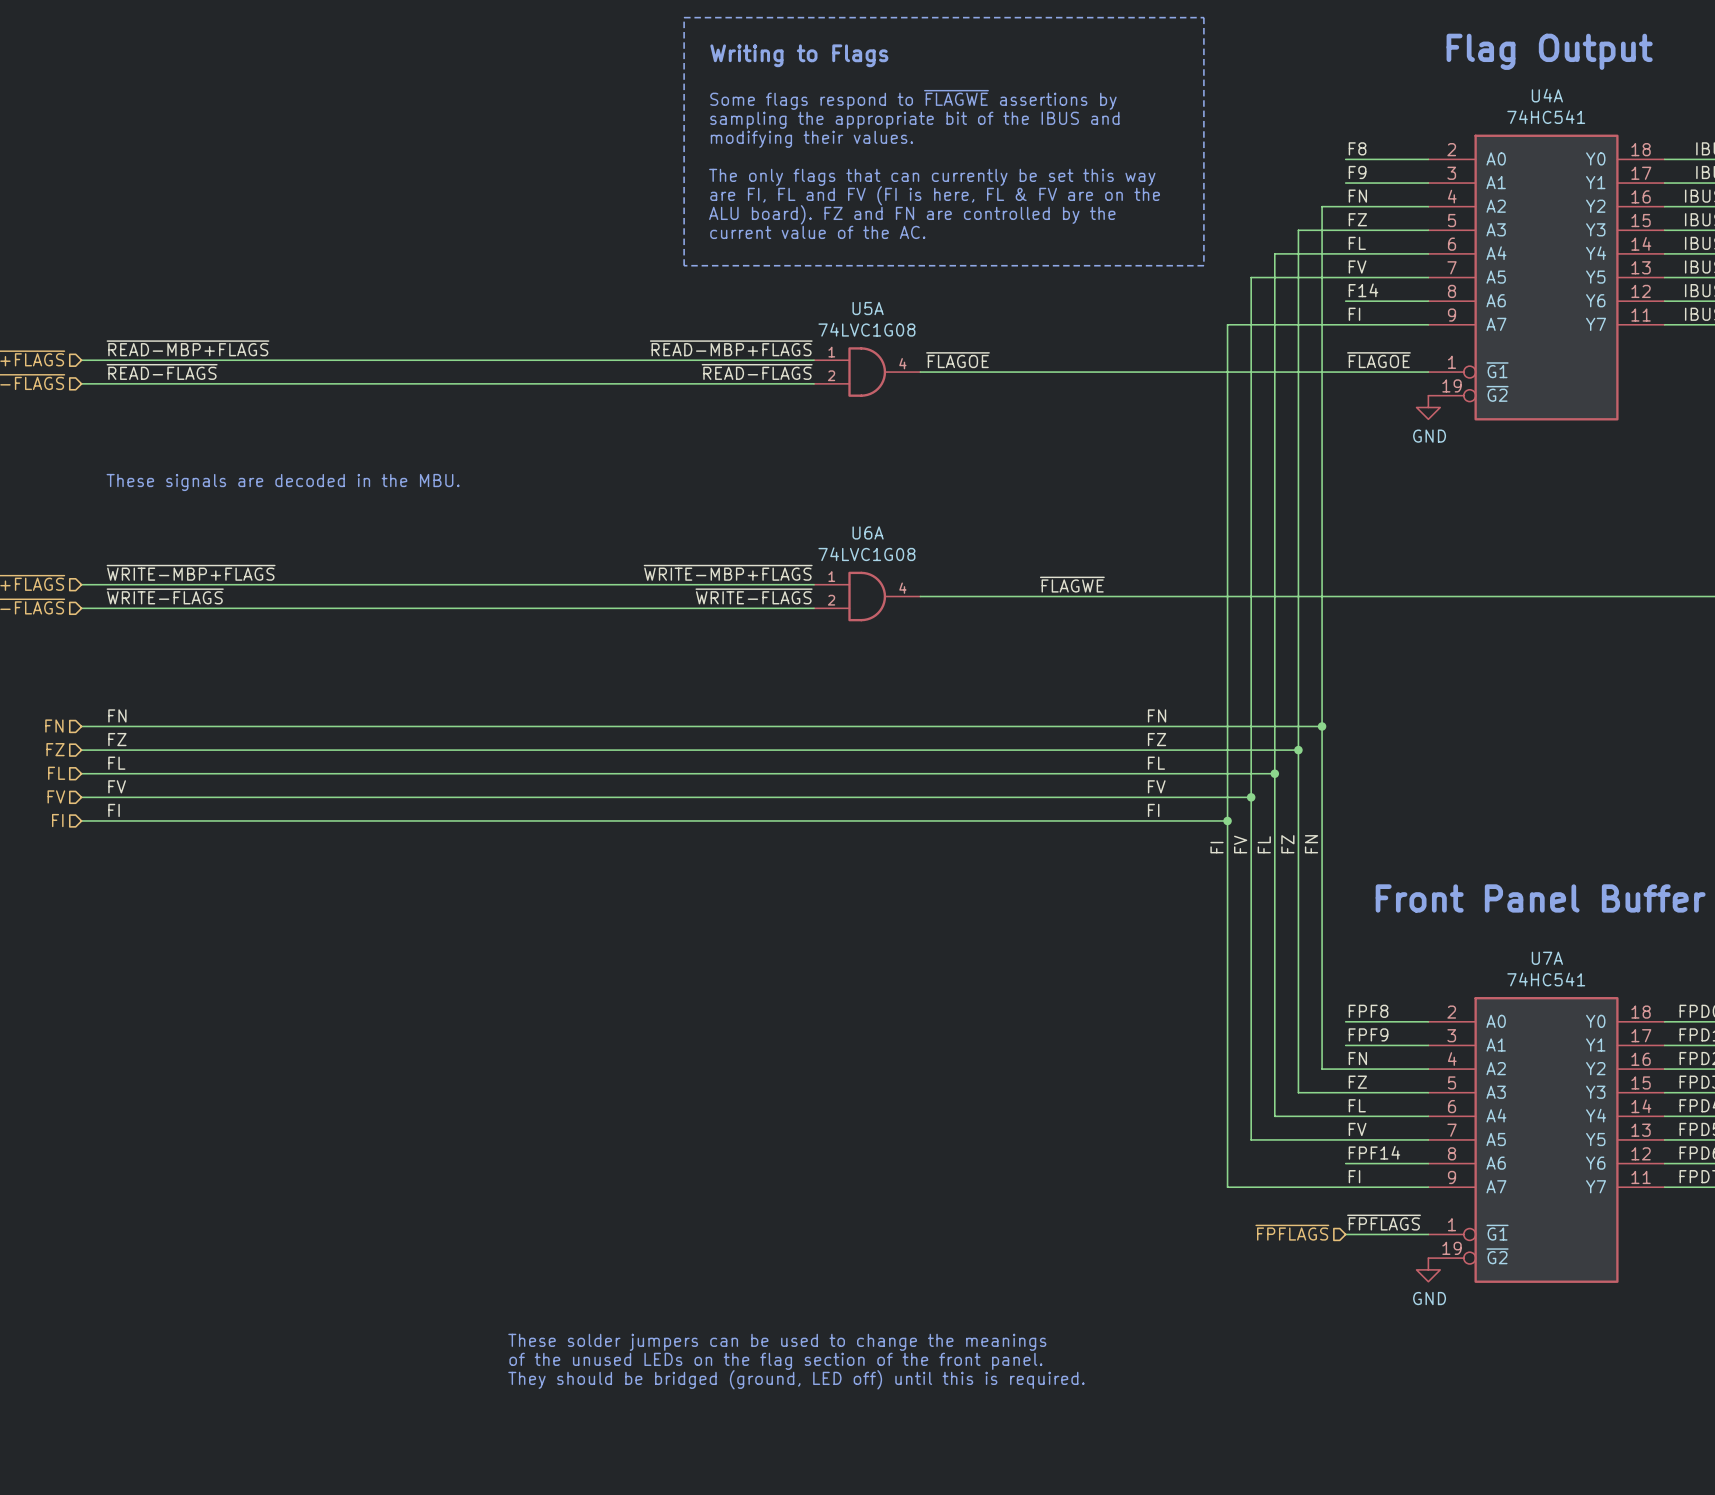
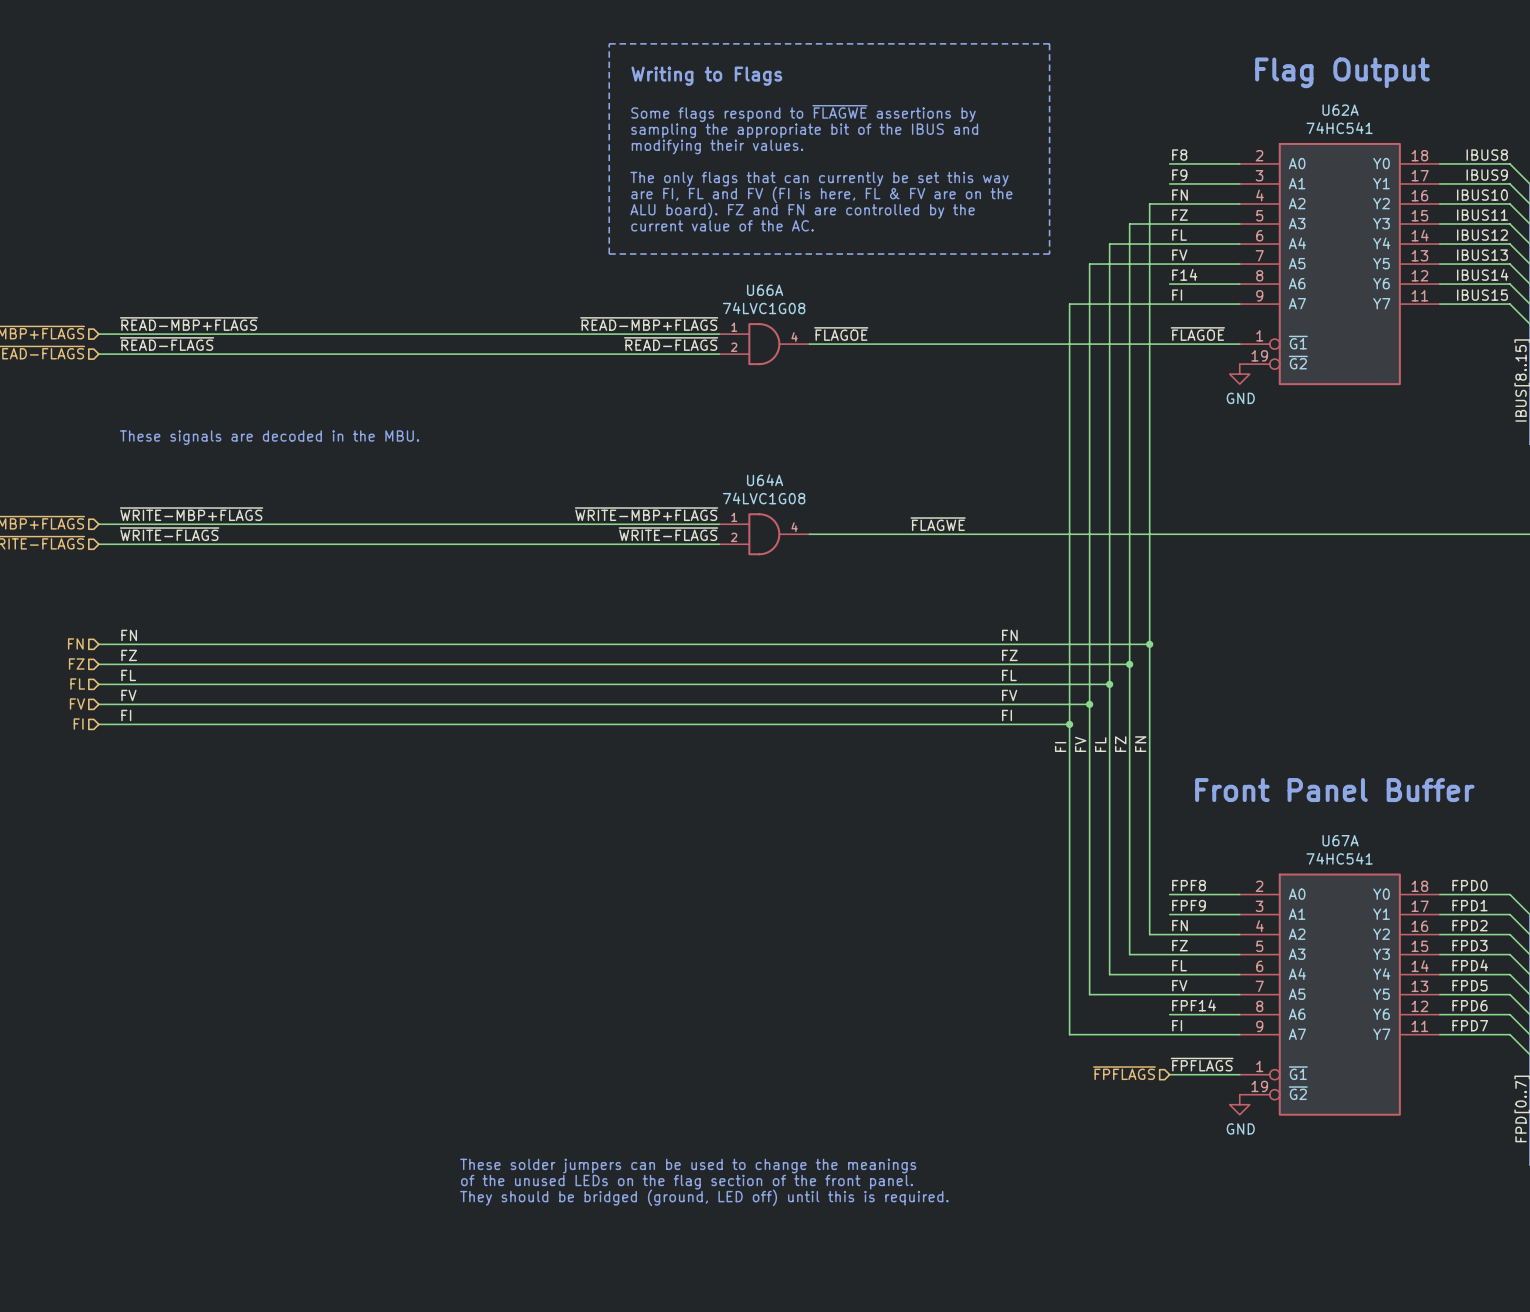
U4A name: U4A (1547, 95) -> U62A (1340, 110)
U5A name: U5A (868, 308) -> U66A (765, 290)
U6A name: U6A (868, 532) -> U64A (765, 480)
U7A name: U7A (1547, 958) -> U67A (1340, 840)

